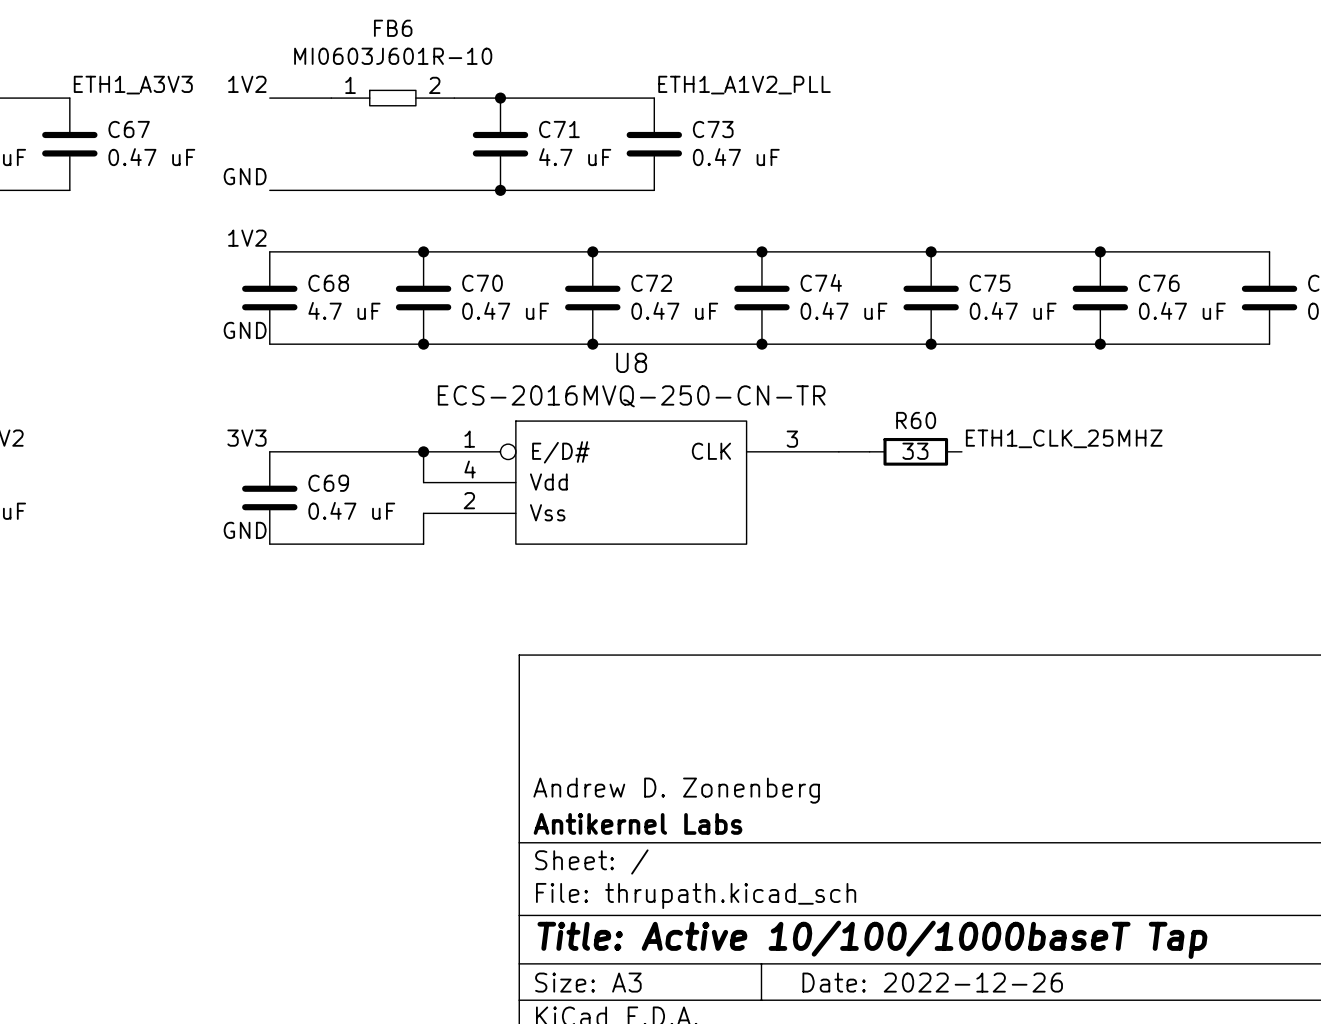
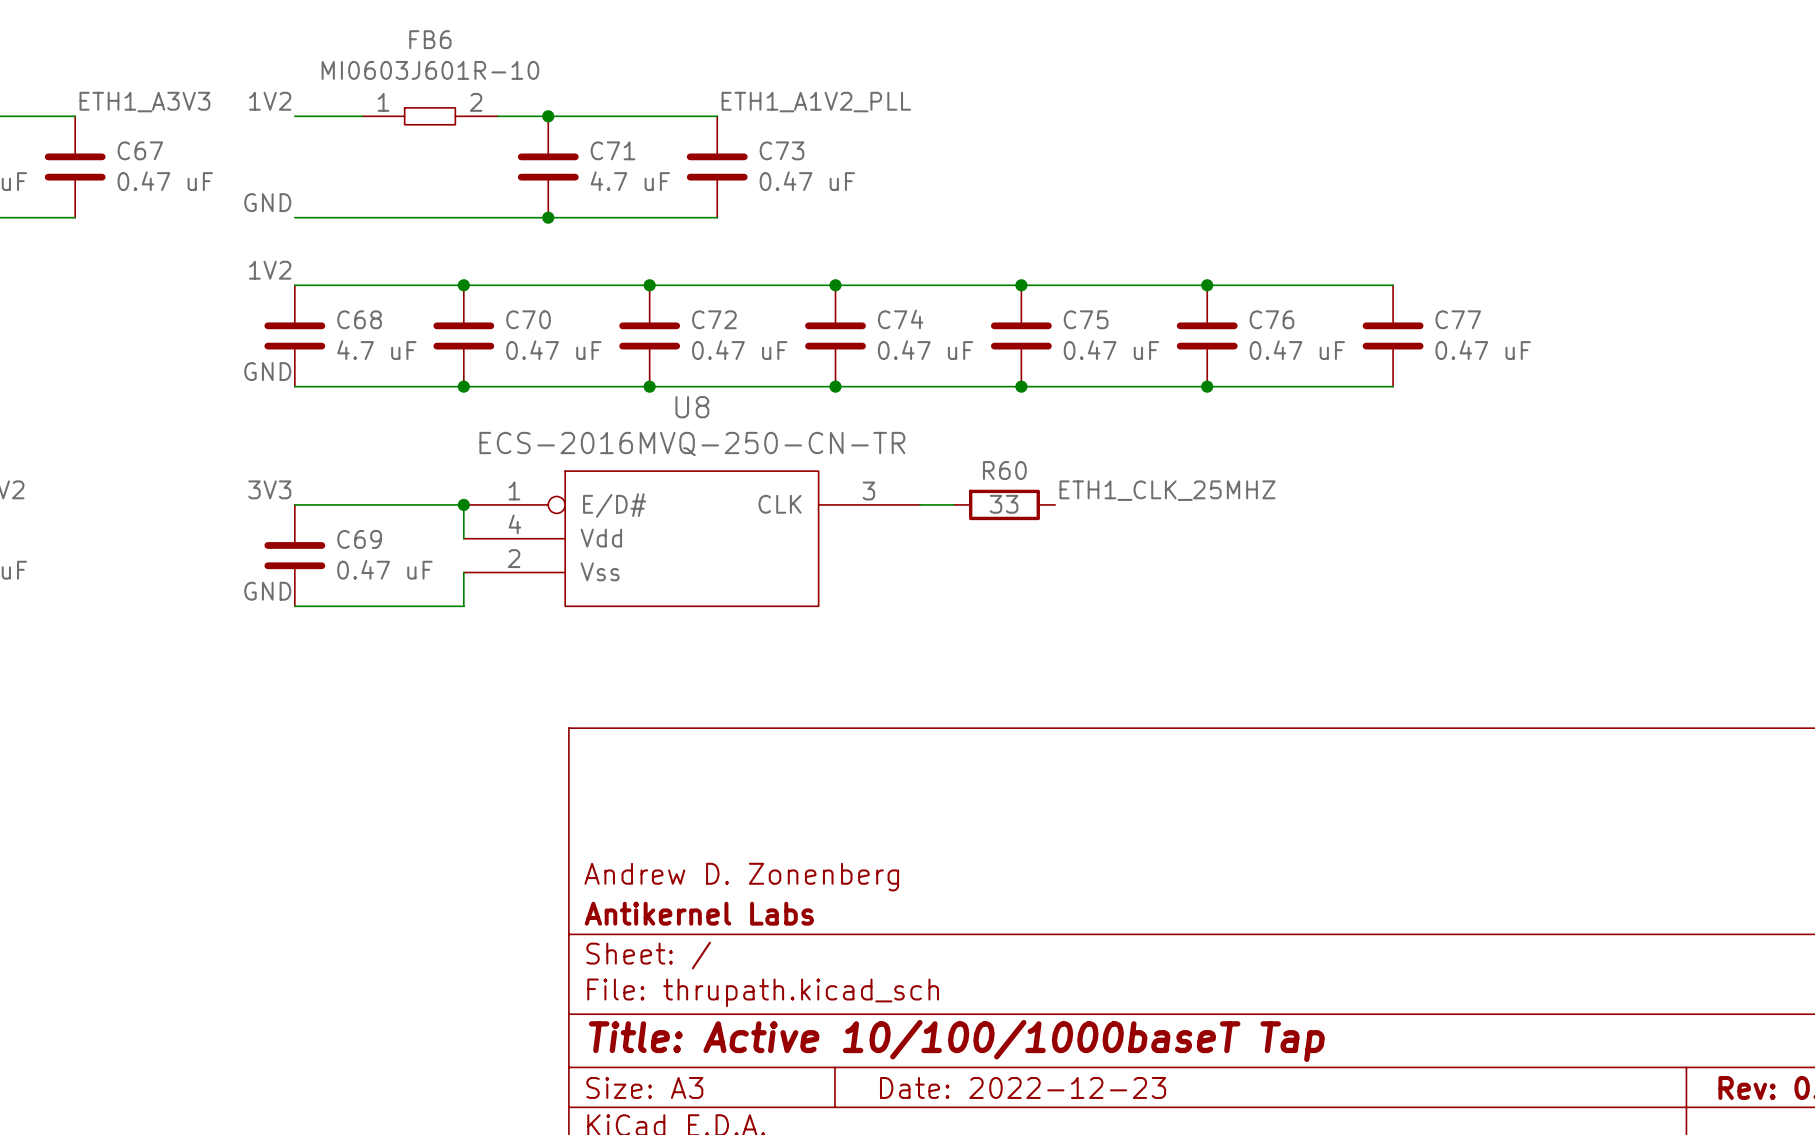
title block: Date: 2022-12-26 (932, 982) -> Date: 2022-12-23 (1023, 1087)

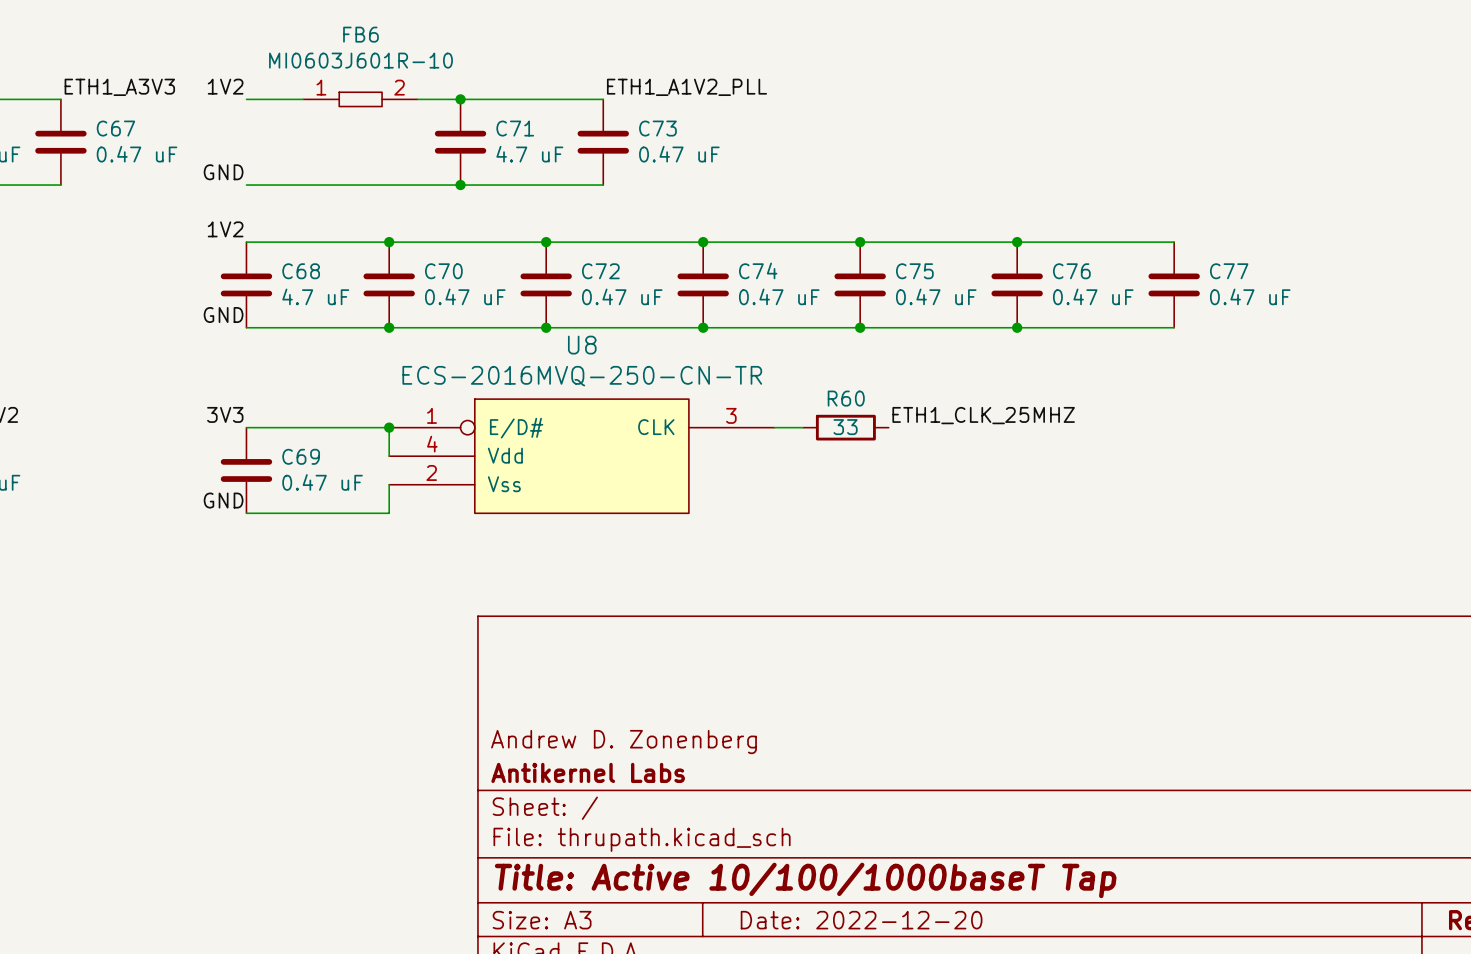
title block: Date: 2022-12-23 (1023, 1087) -> Date: 2022-12-20 (861, 920)

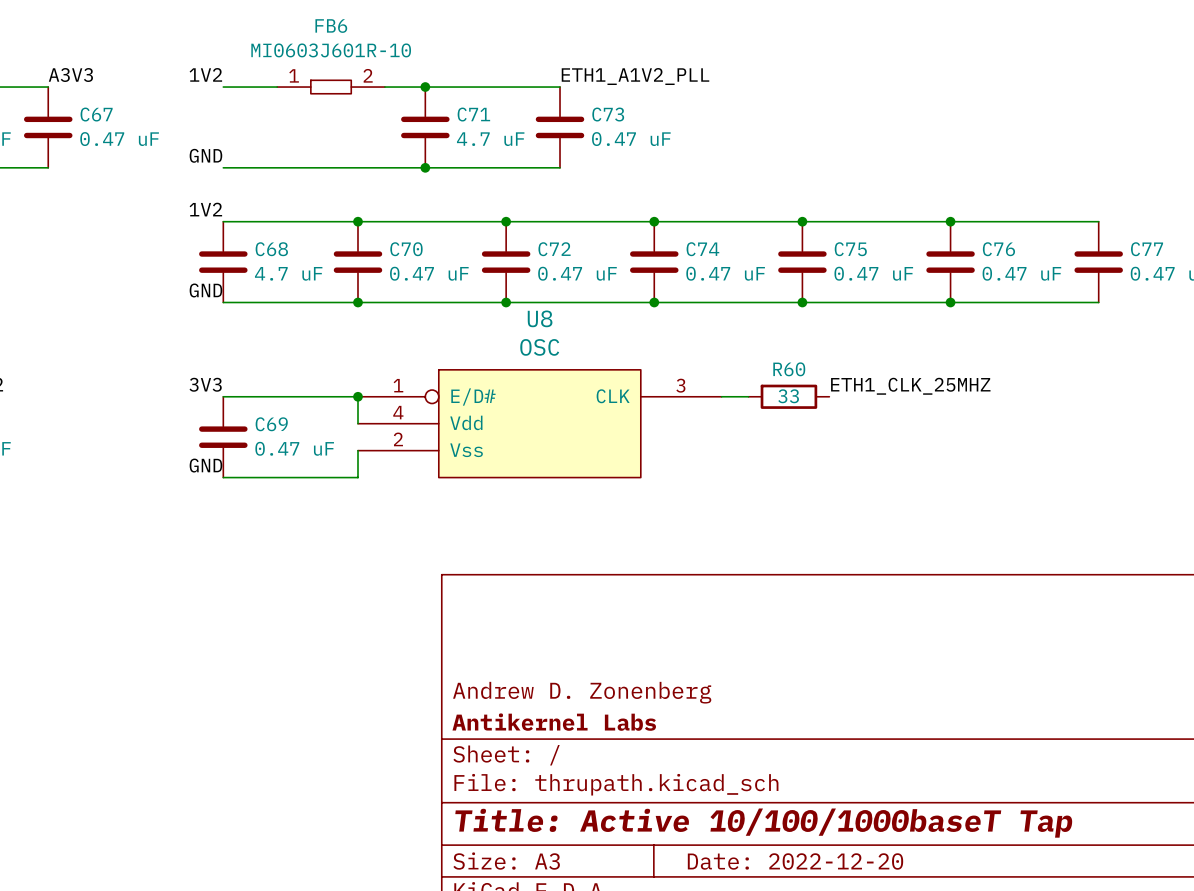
label: ETH1_A3V3 (119, 87) -> A3V3 (70, 75)
U8 value: ECS-2016MVQ-250-CN-TR (582, 376) -> OSC (539, 347)

